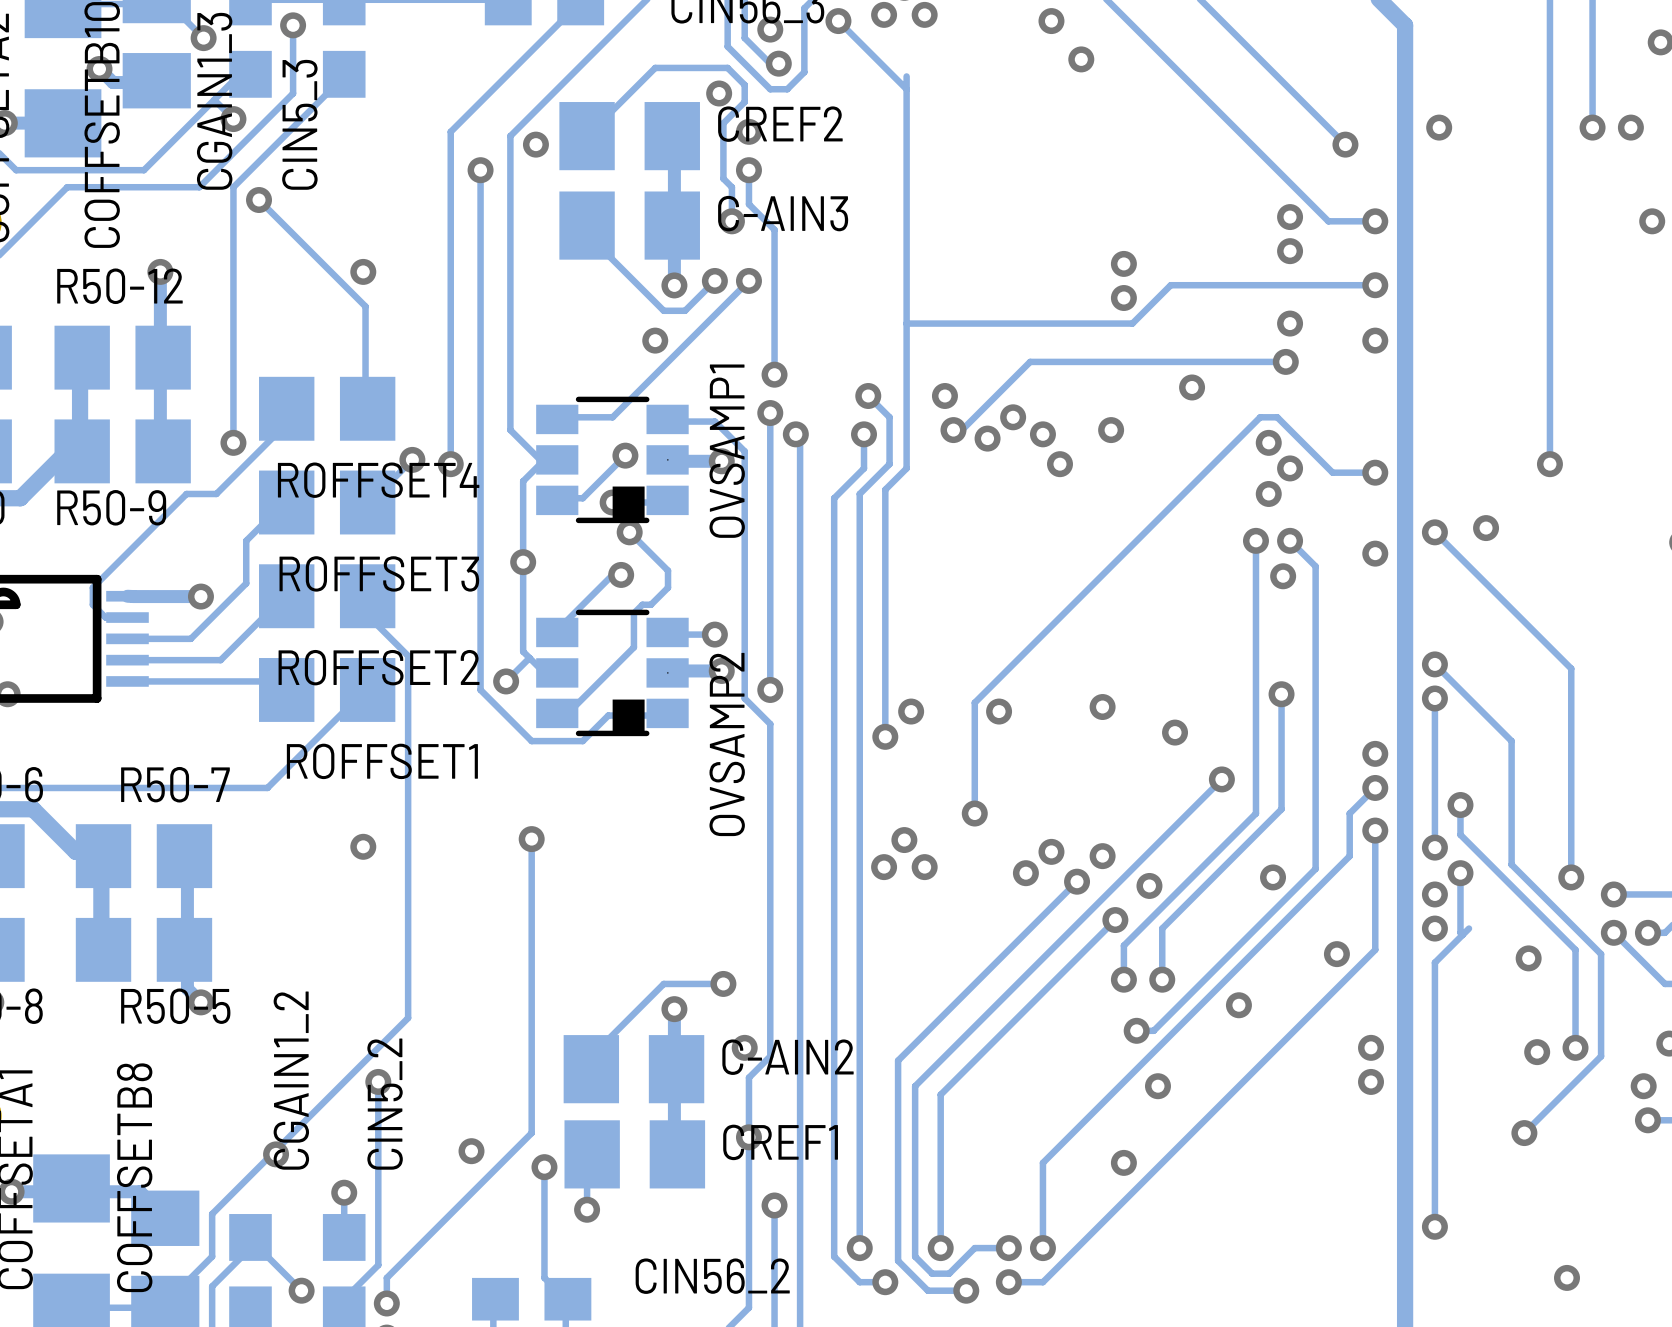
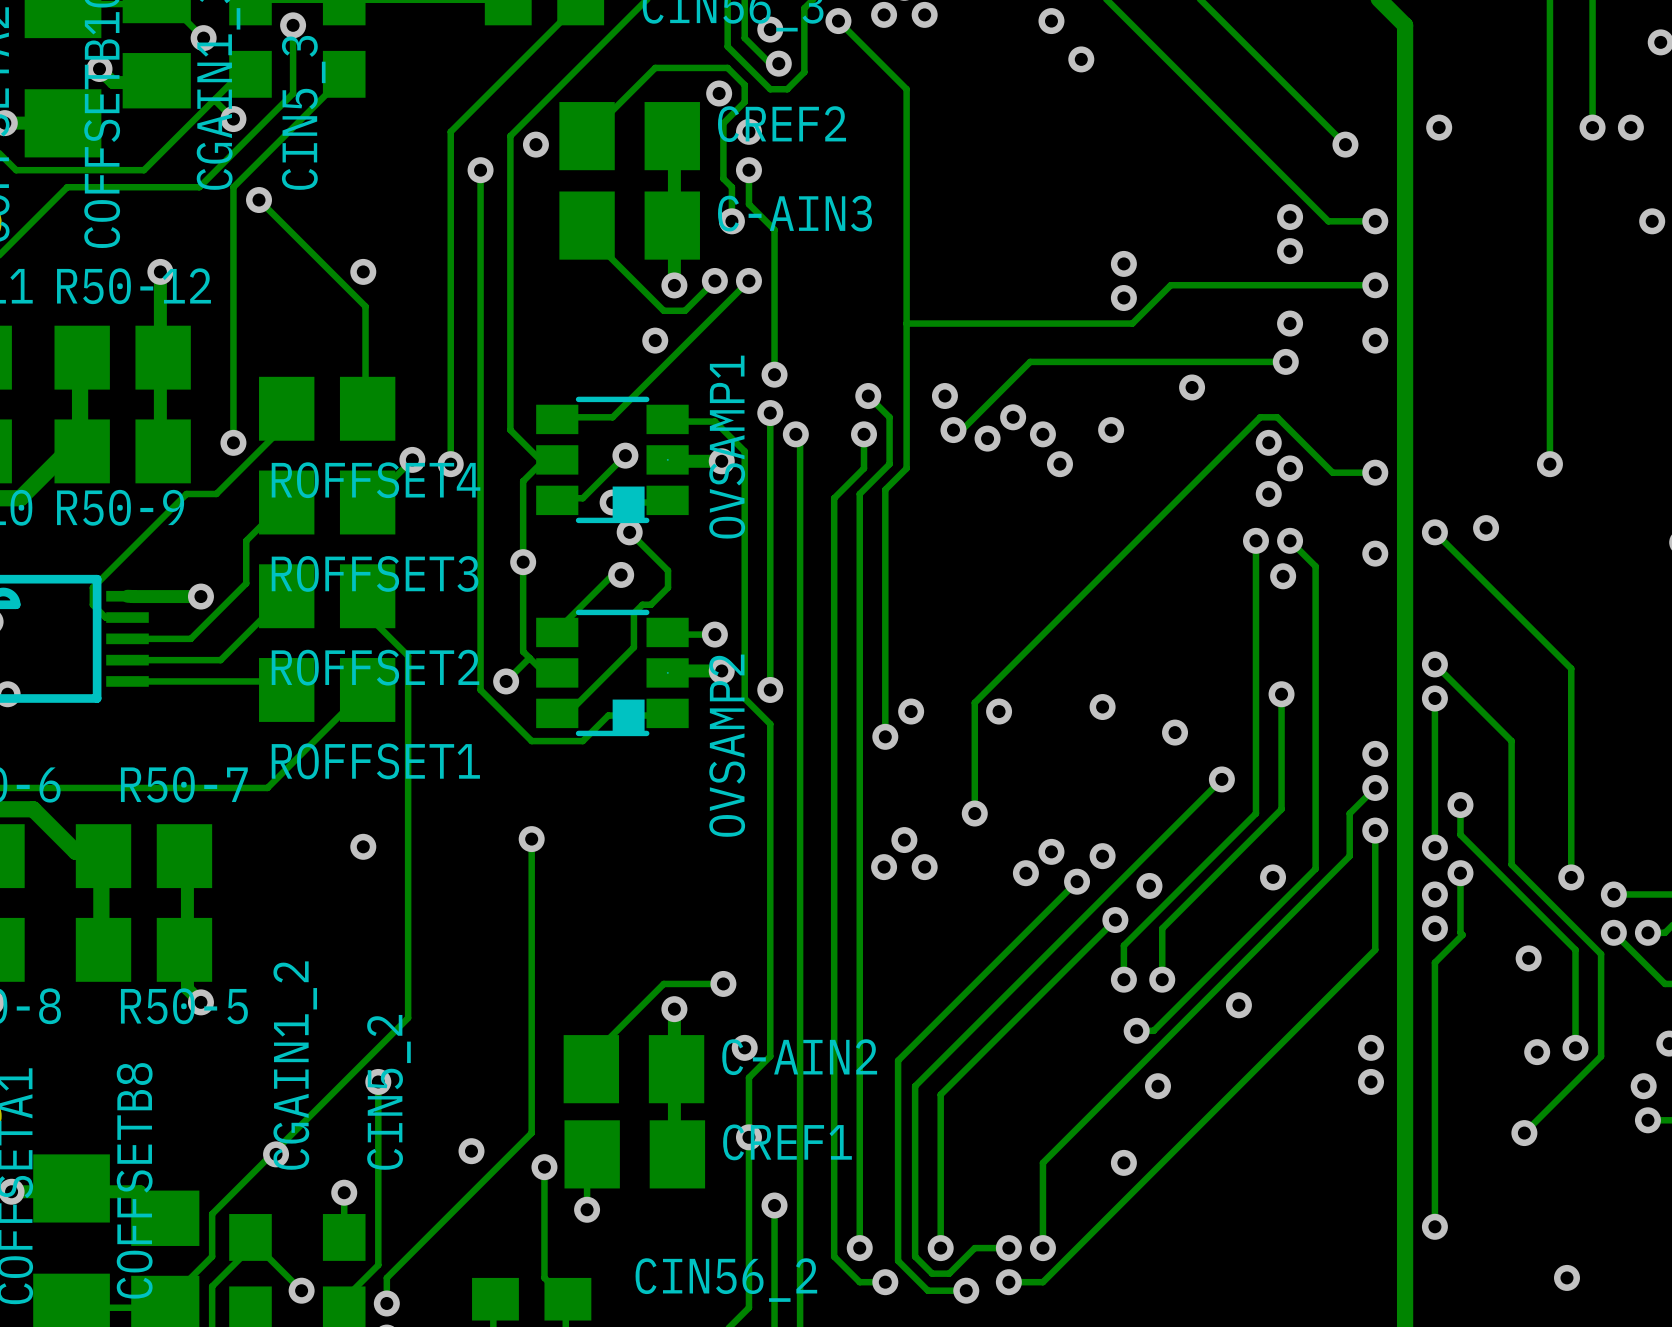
track: (906, 76) (906, 89) -> none
track: (1469, 928) (1462, 934) -> none
via: (1336, 954) -> none

